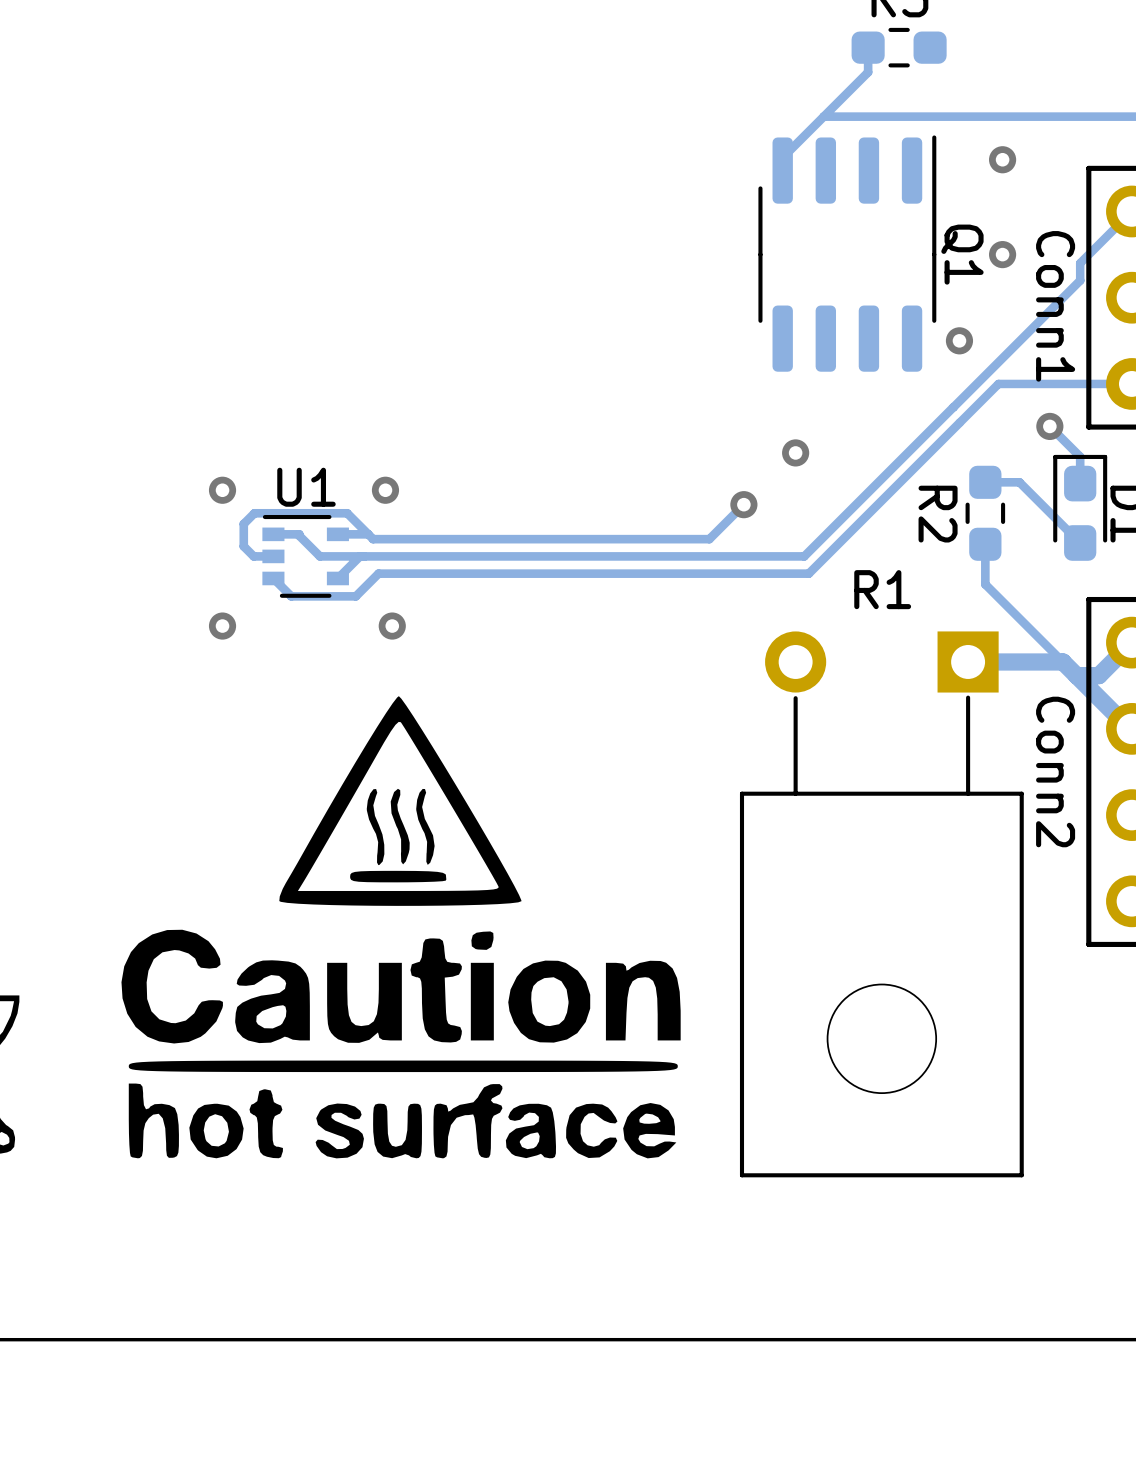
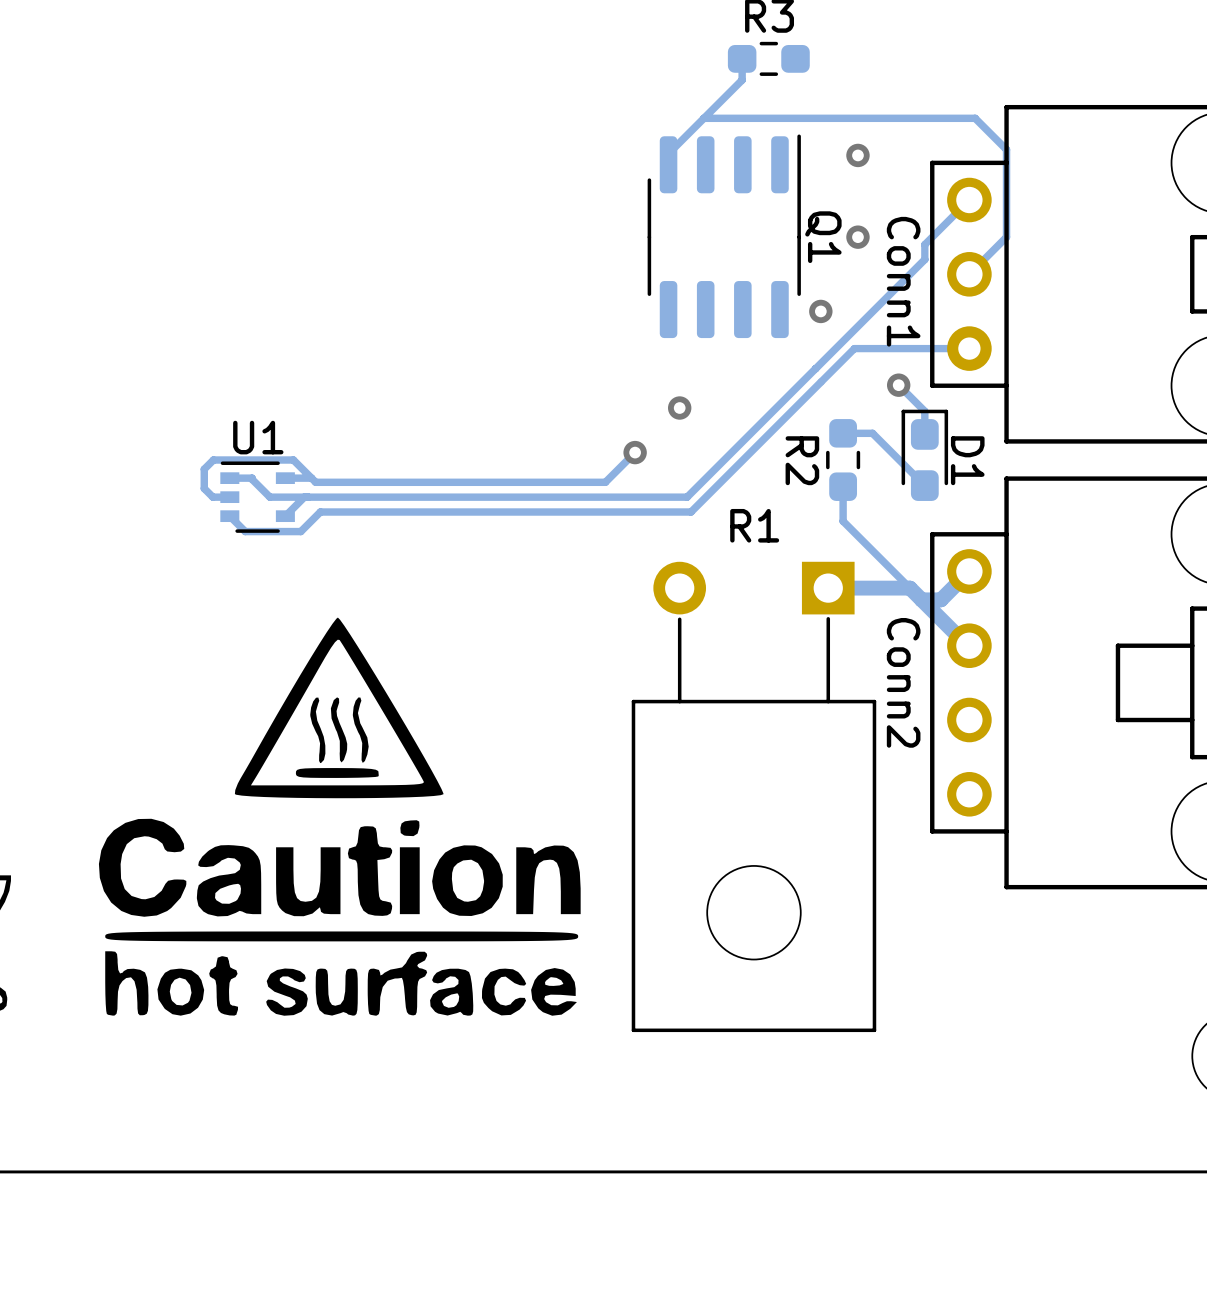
via: (222, 490) -> none
via: (385, 490) -> none
via: (222, 626) -> none
via: (392, 626) -> none

